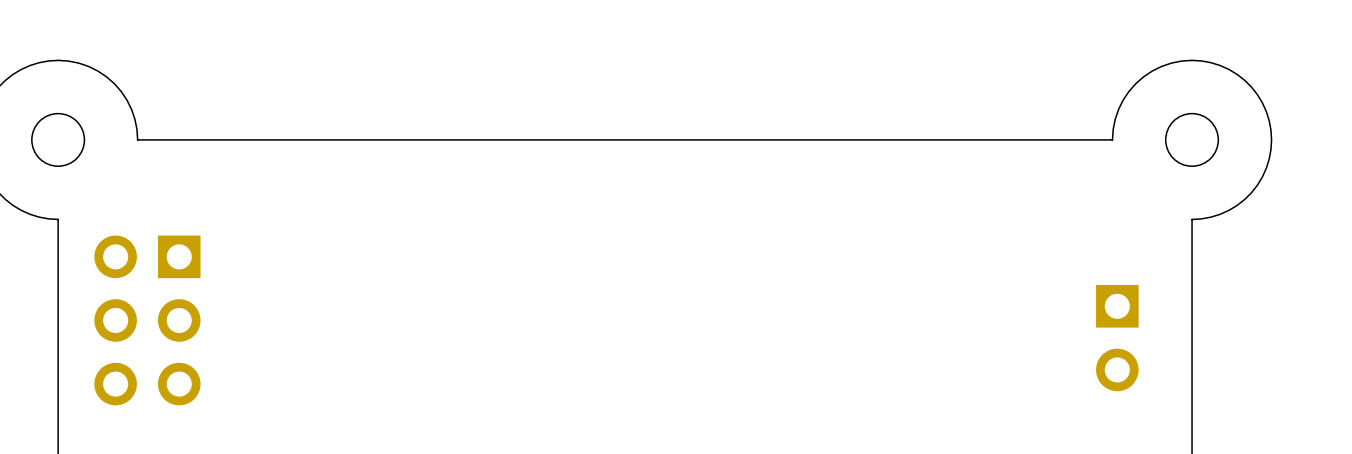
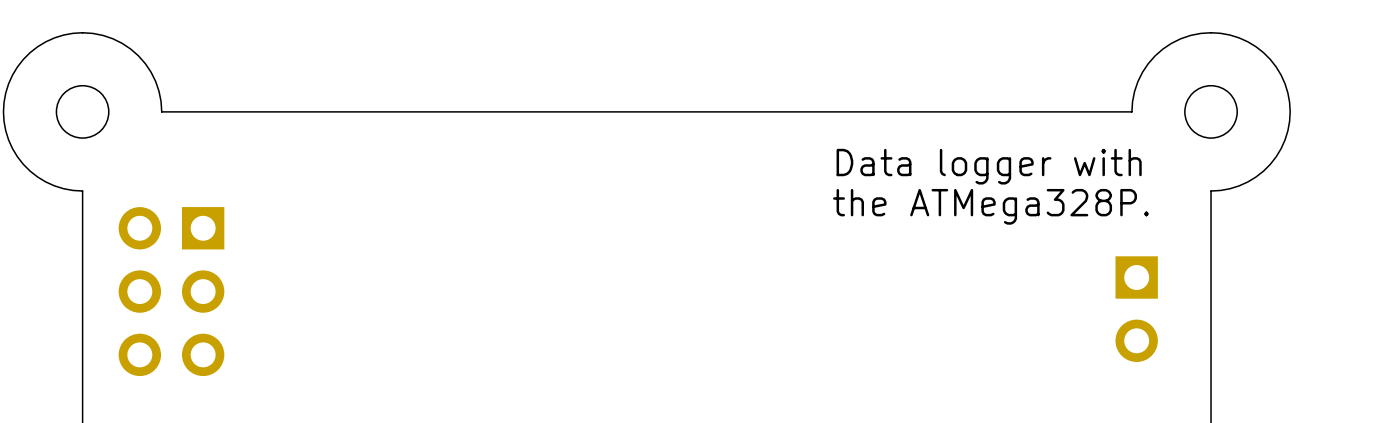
text: none -> Data logger with (989, 166)
text: none -> the ATMega328P. (990, 206)

